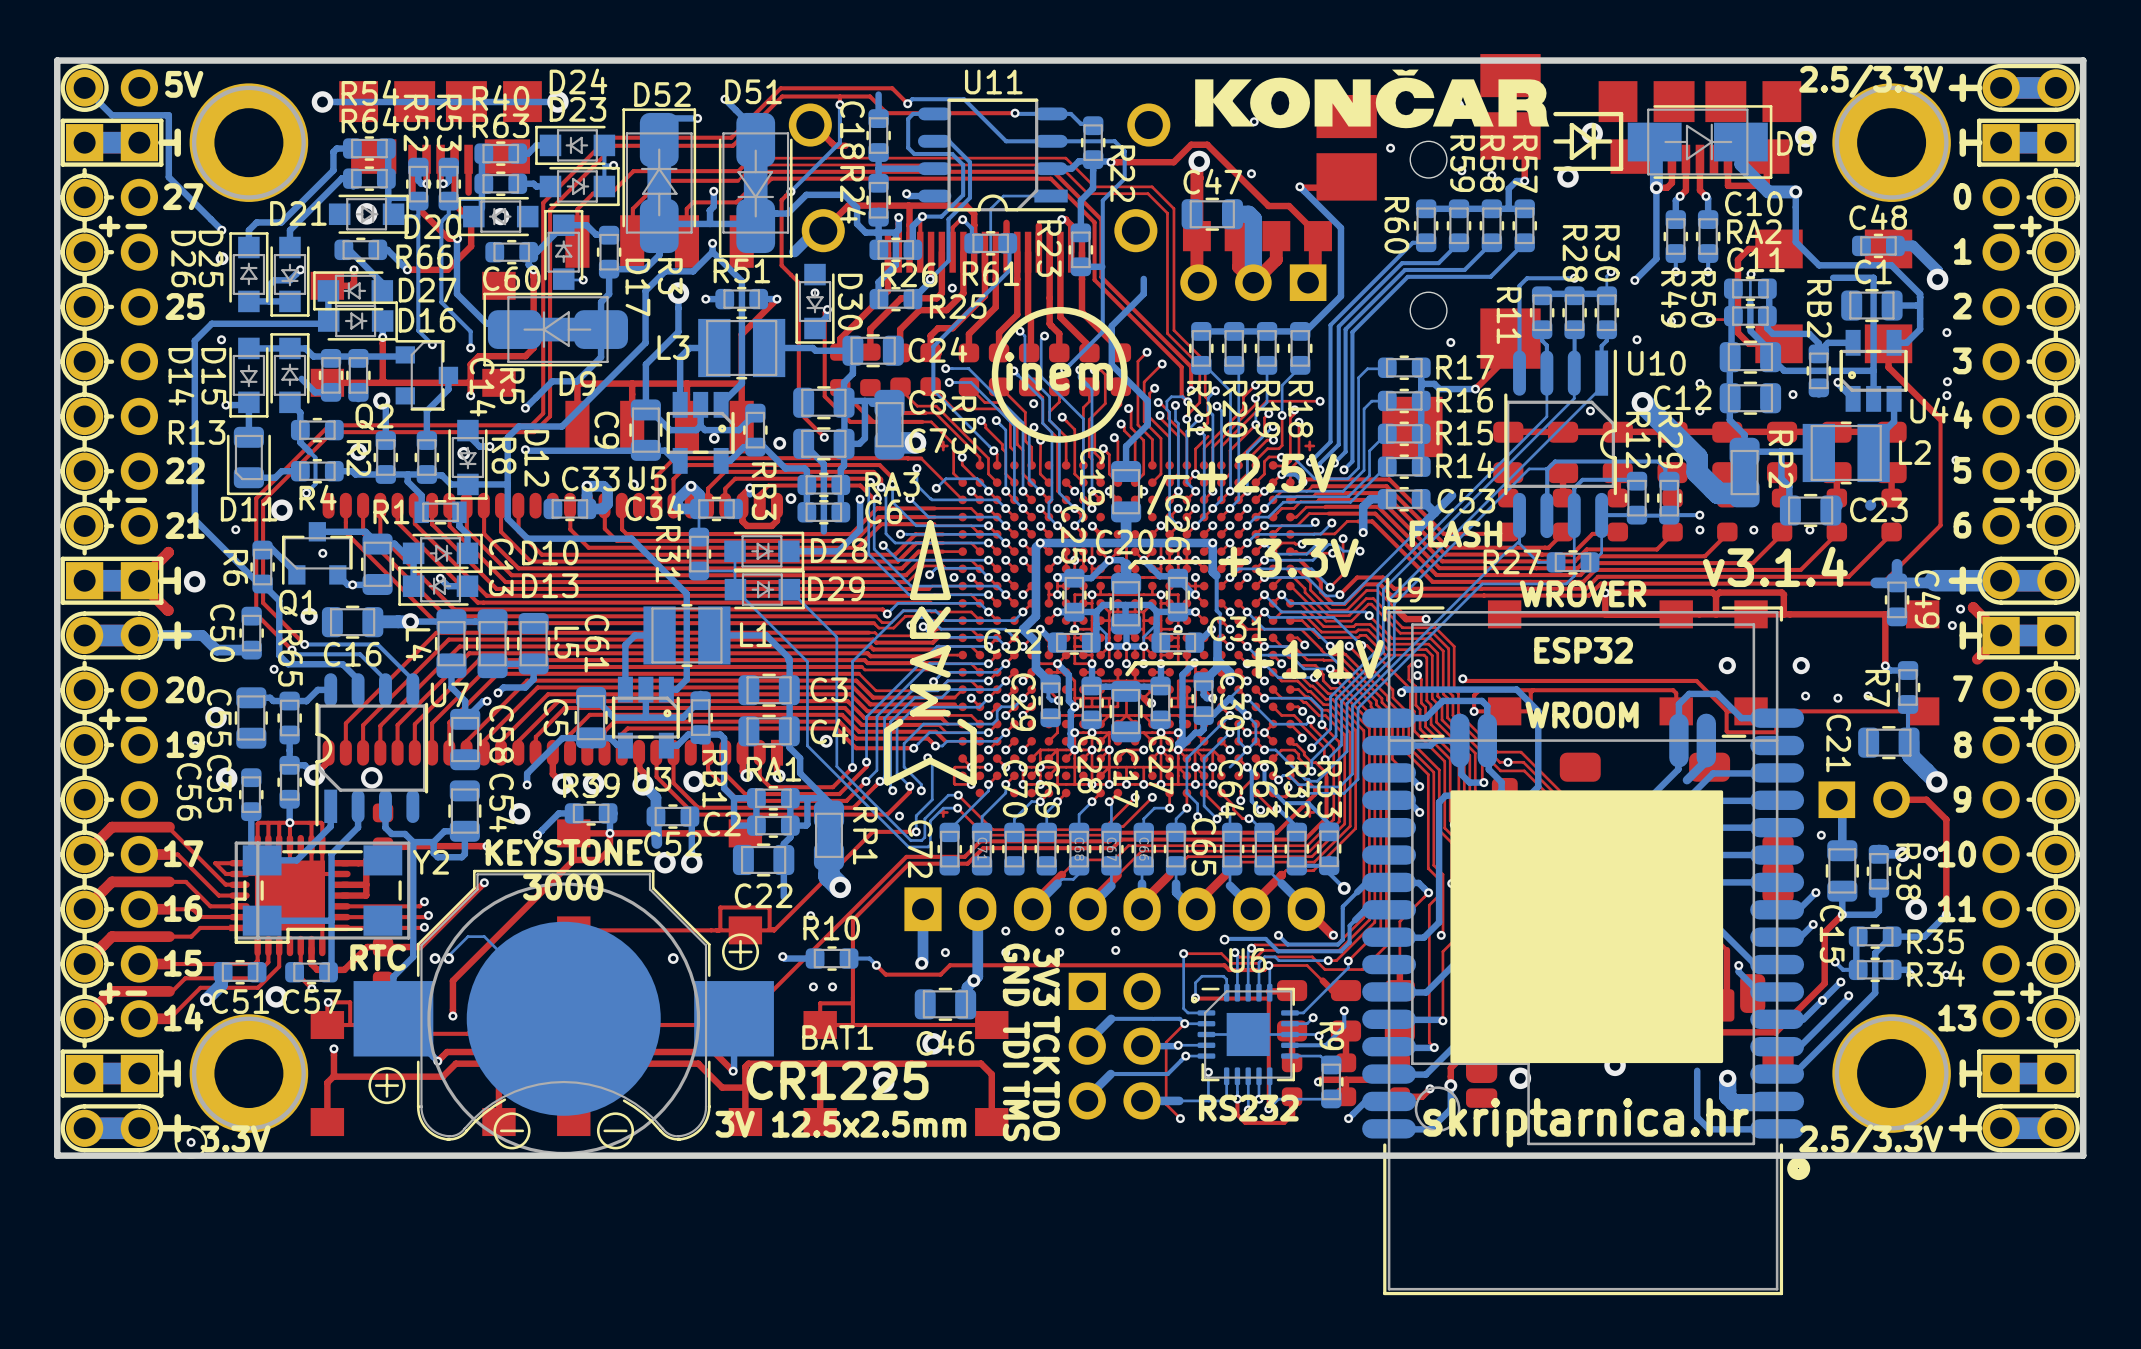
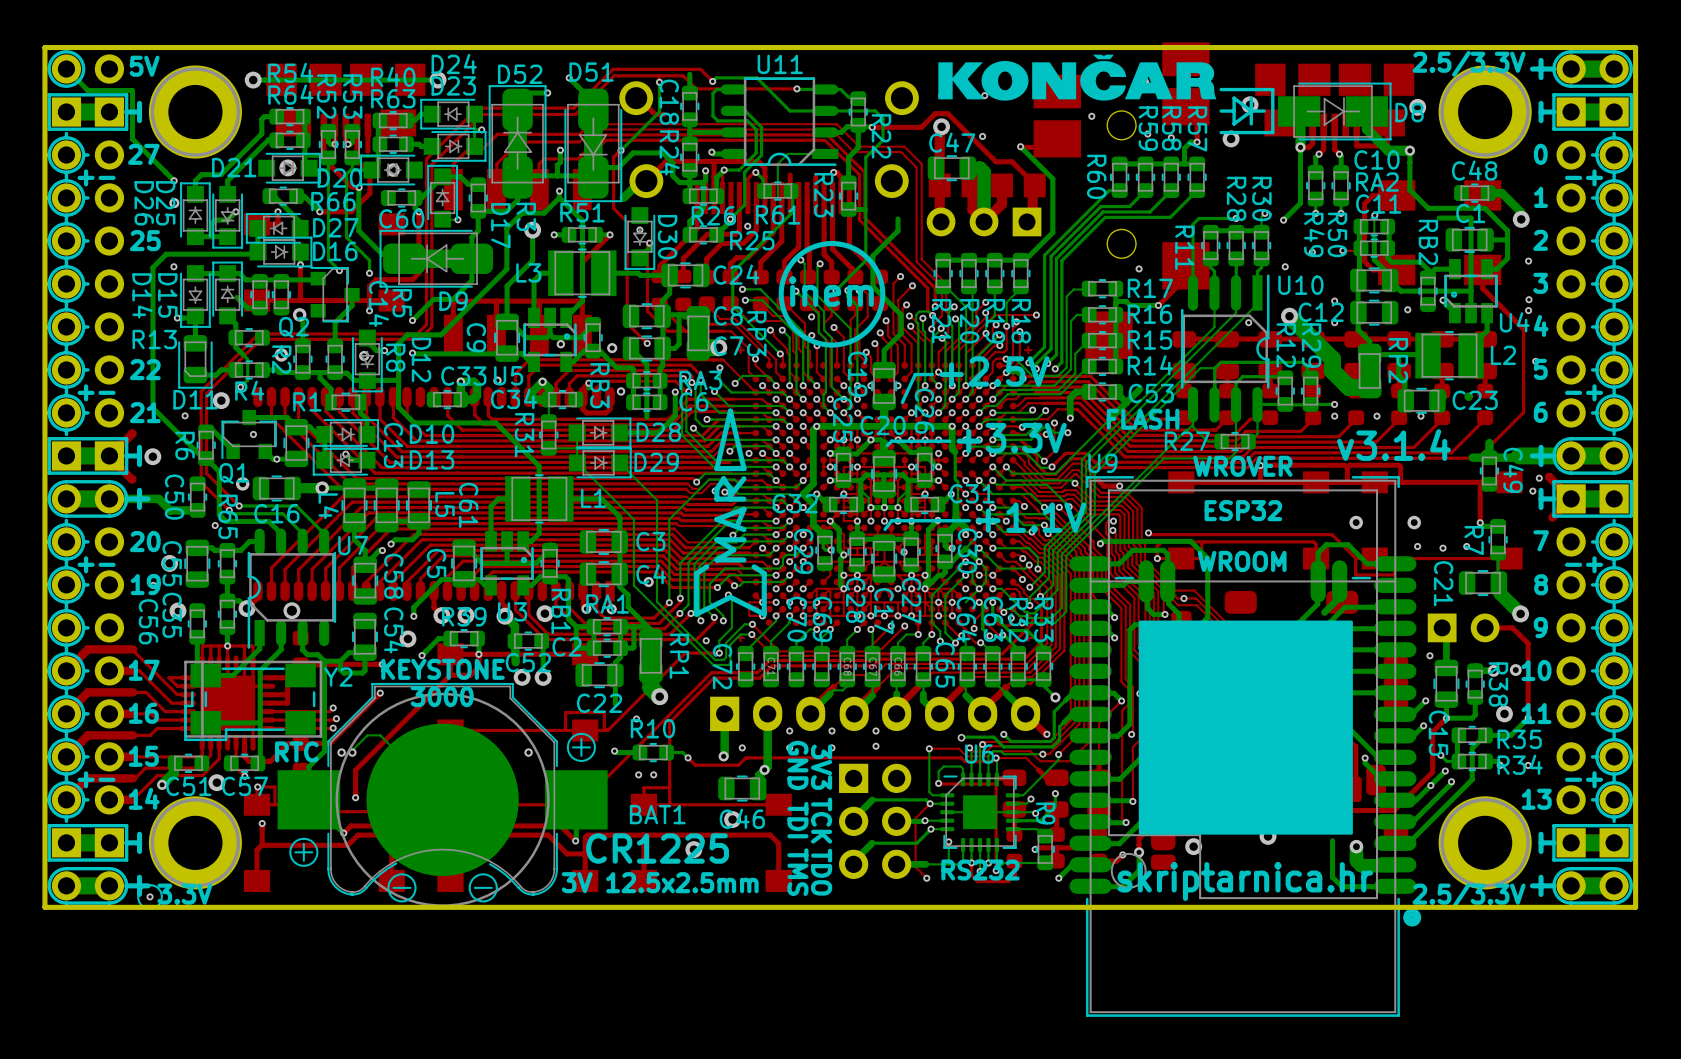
U6 footprint: [1190, 983, 1299, 1086] -> [940, 772, 1020, 853]

